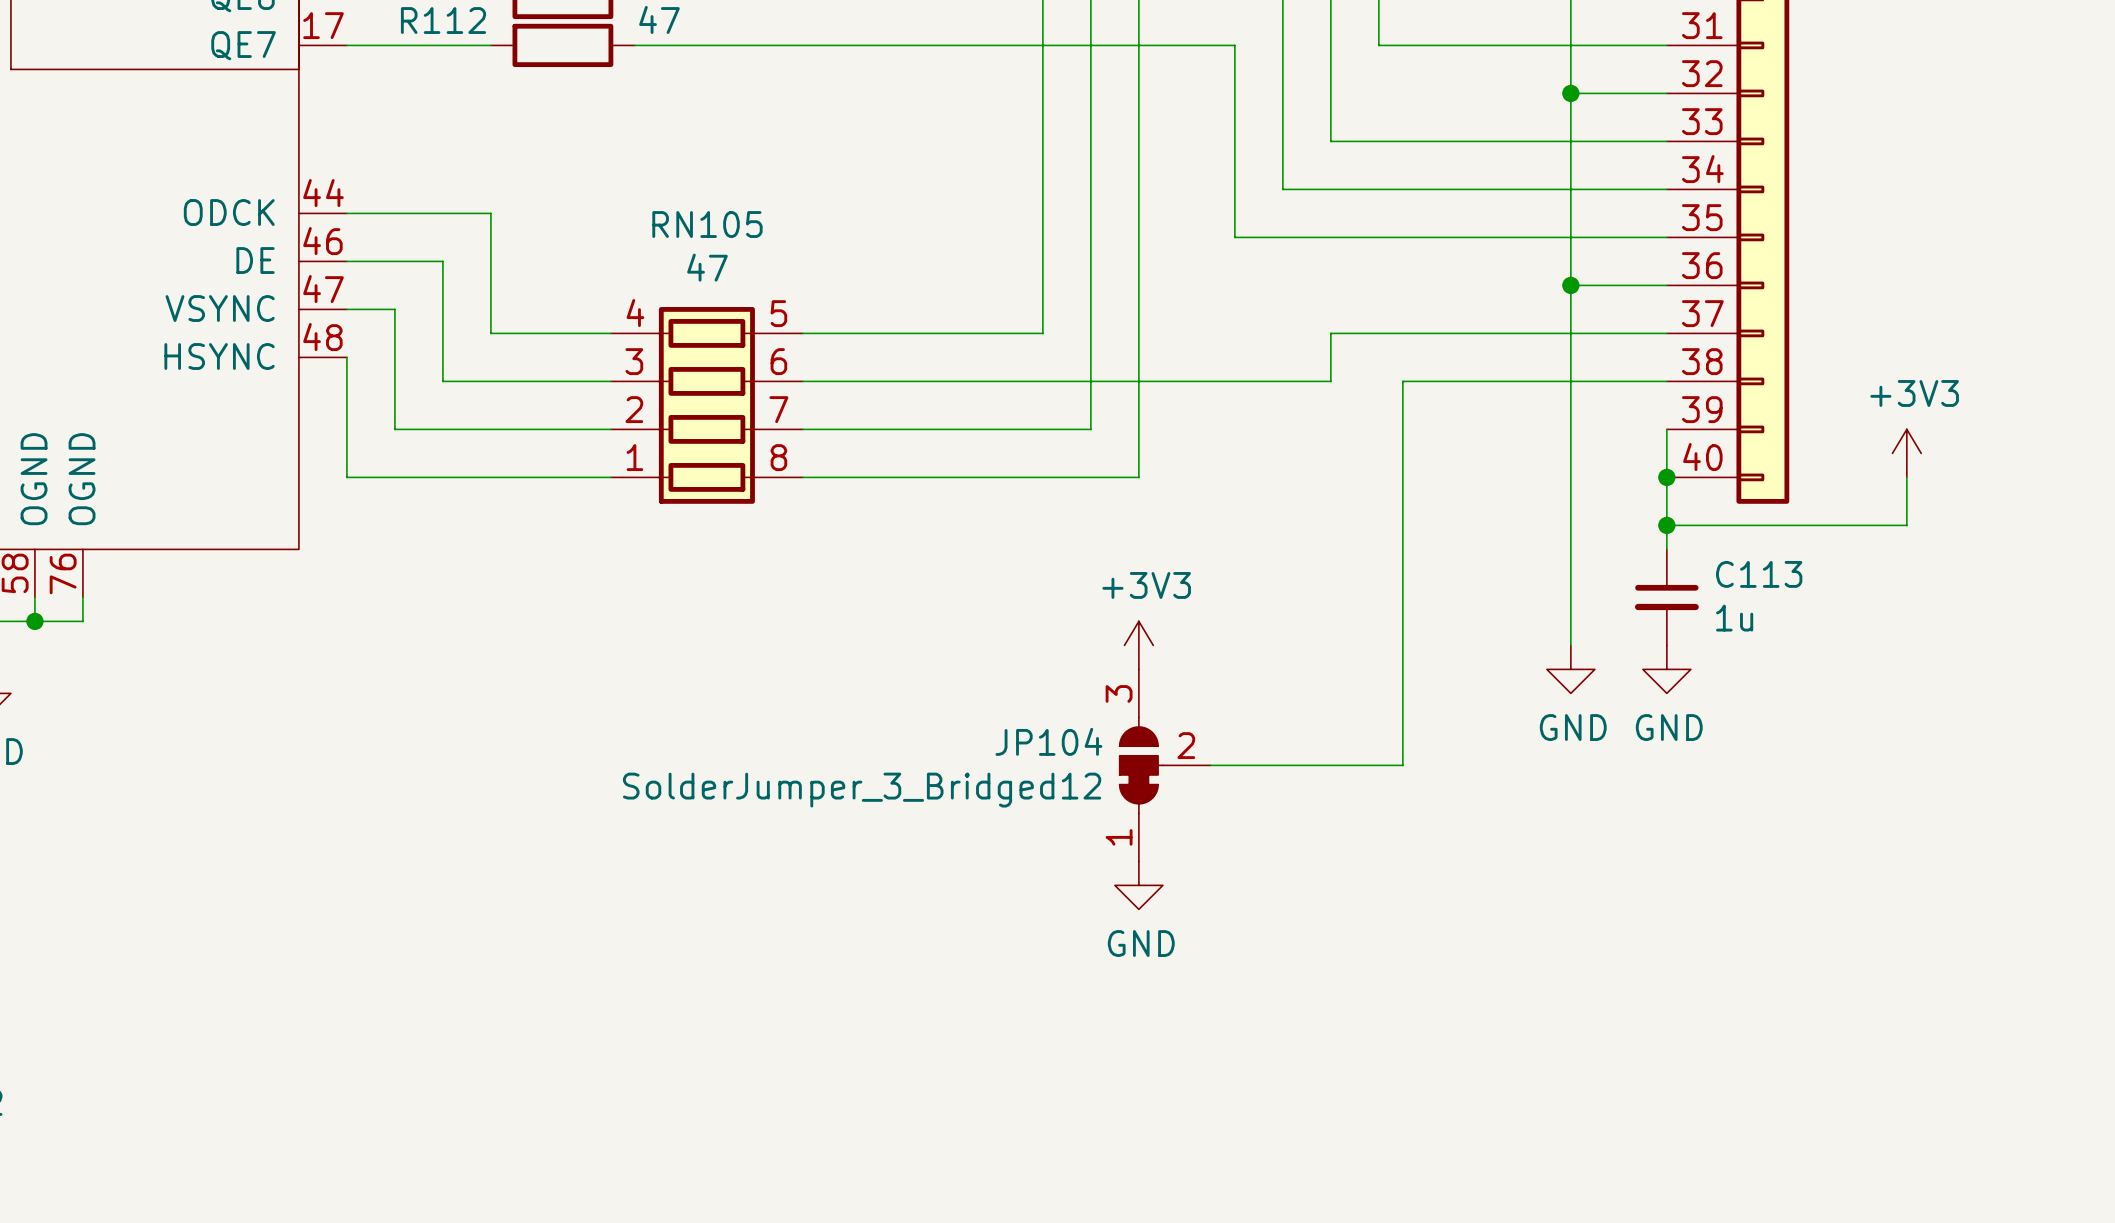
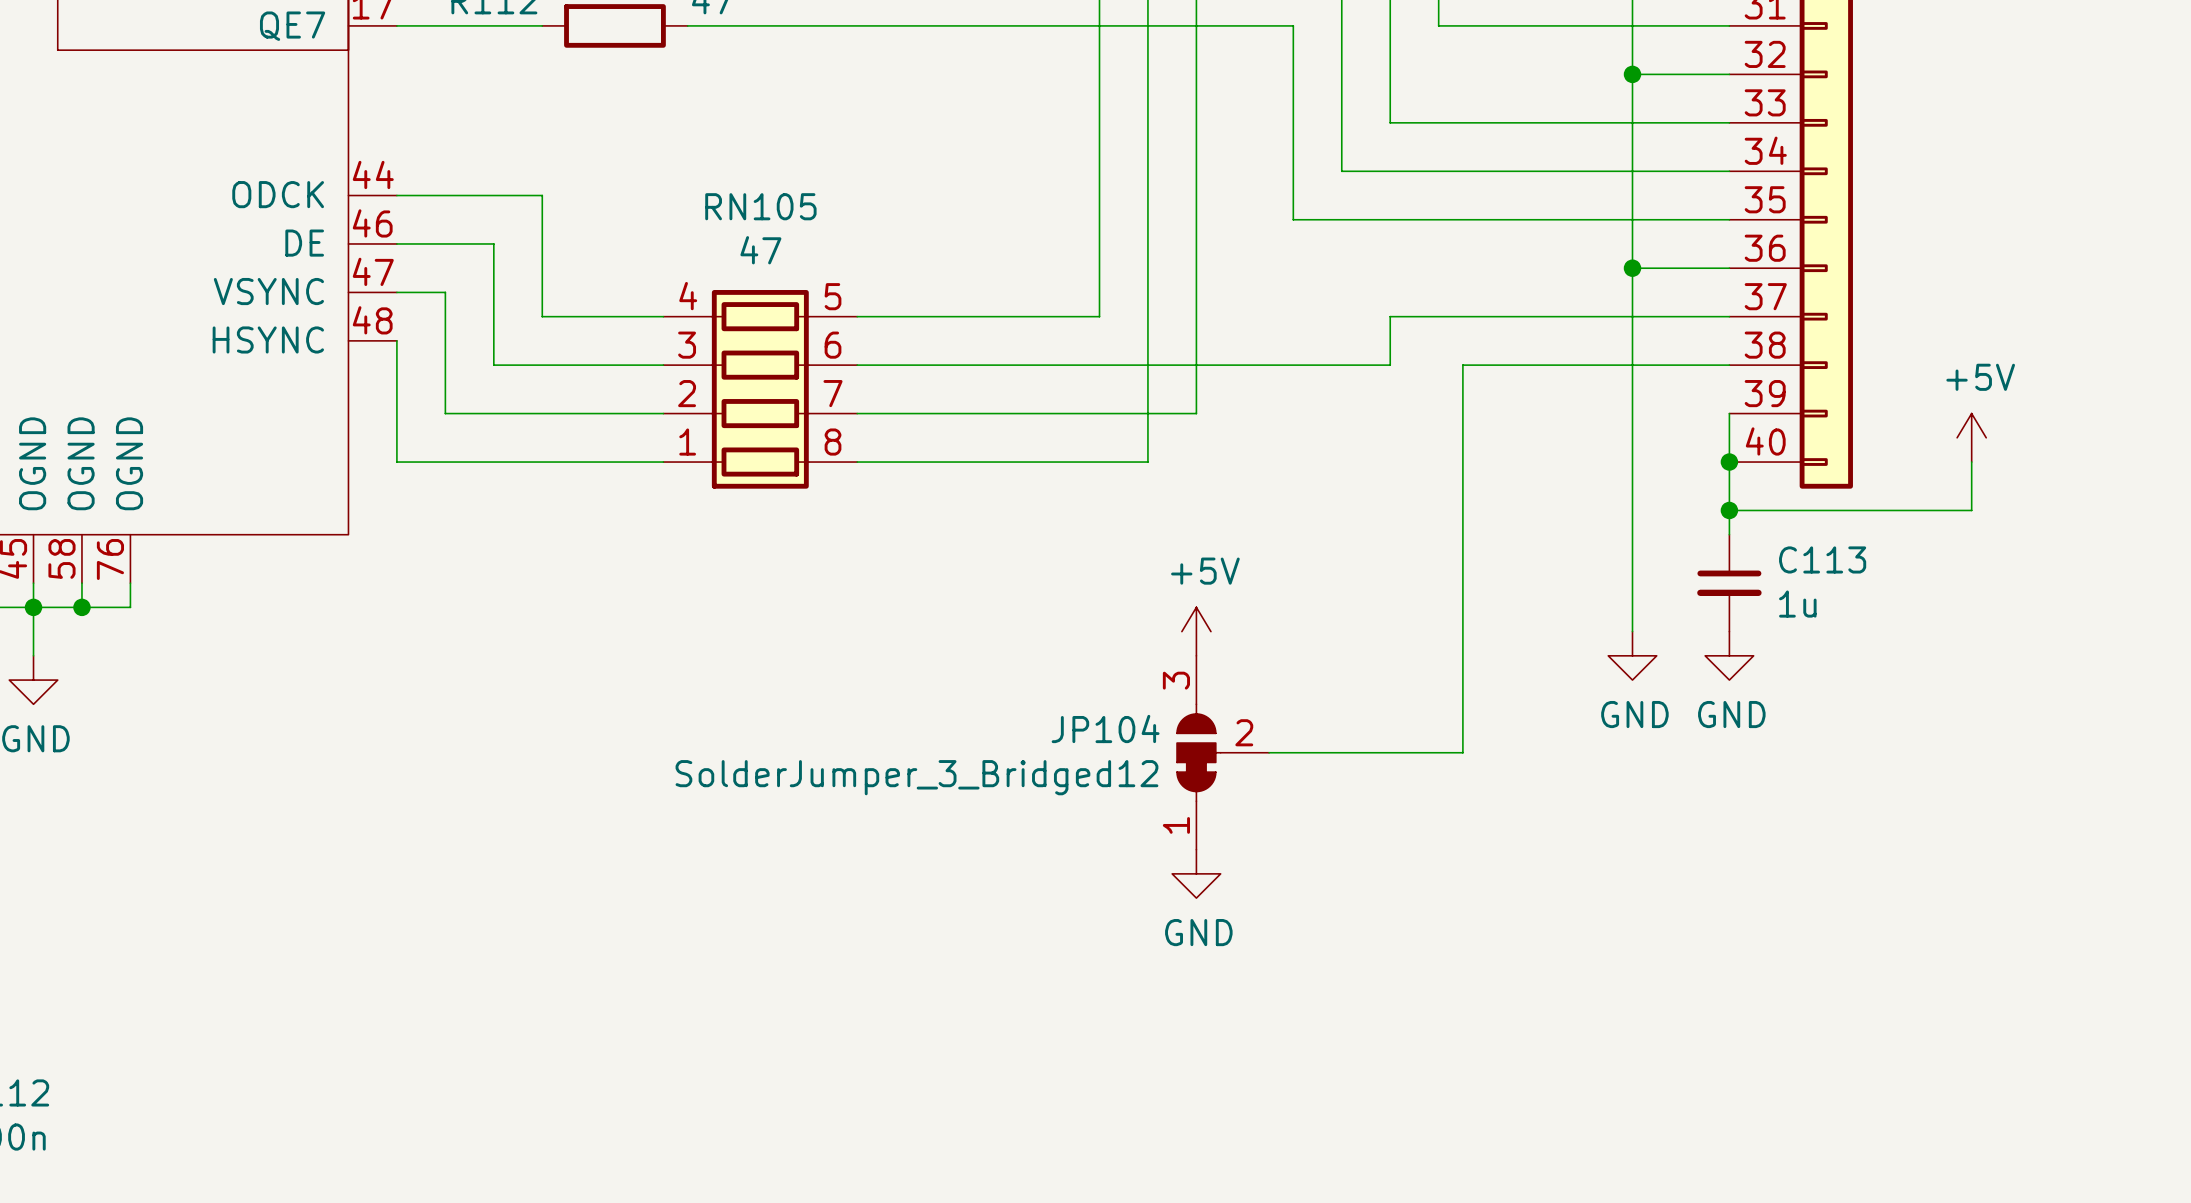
wire: (1138, 429) (1138, 477) (1090, 477) -> (1196, 413) (1147, 413) (1147, 462)
power symbol: +3V3 (1906, 453) -> +5V (1971, 437)
power symbol: +3V3 (1138, 645) -> +5V (1196, 631)

